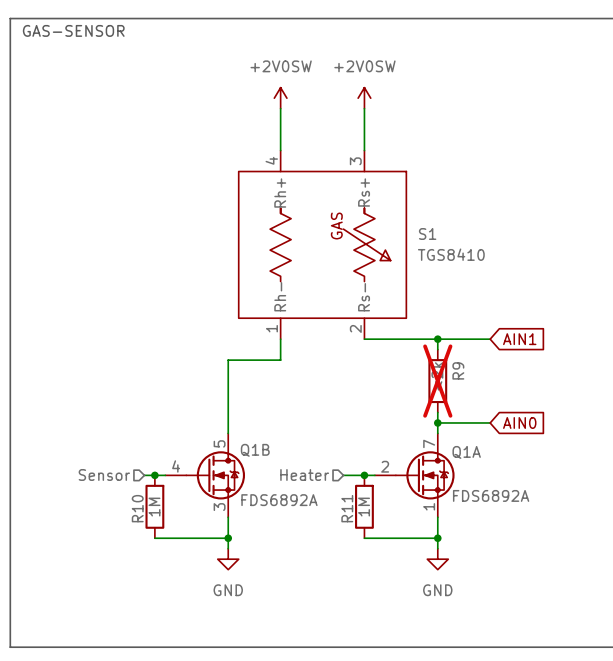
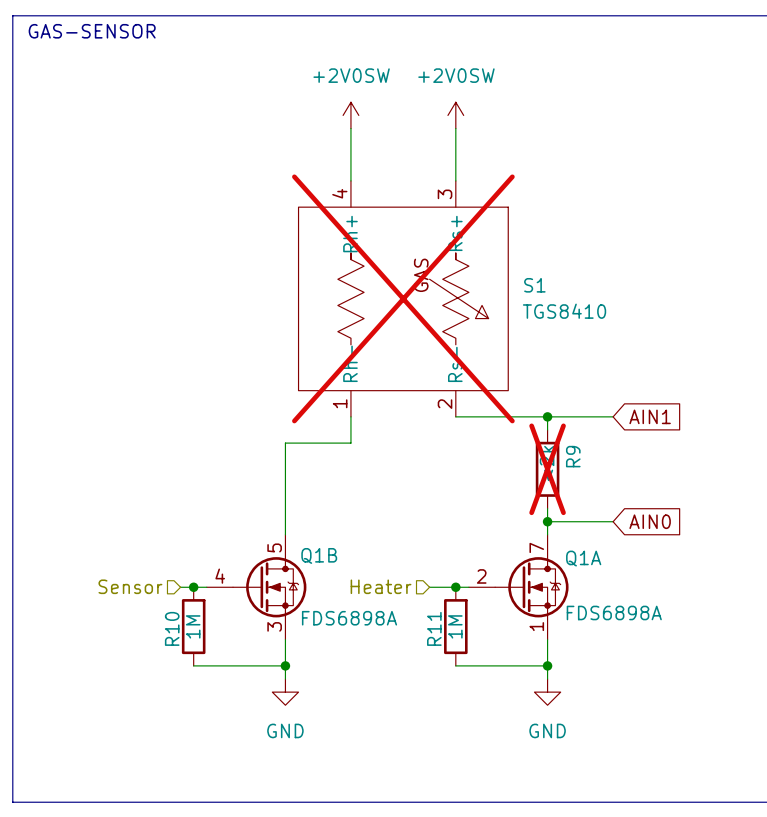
S1 do-not-place cross: none -> (403, 298)
Q1A value: FDS6892A (491, 495) -> FDS6898A (614, 612)
Q1B value: FDS6892A (279, 500) -> FDS6898A (349, 618)

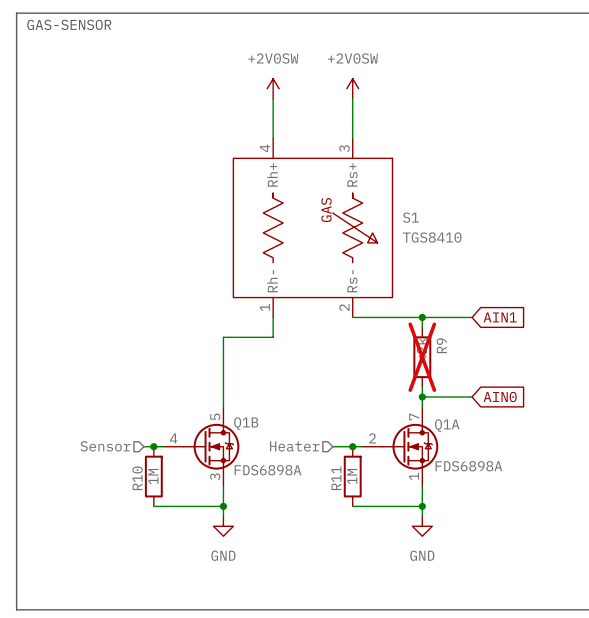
S1 do-not-place cross: (403, 298) -> none

